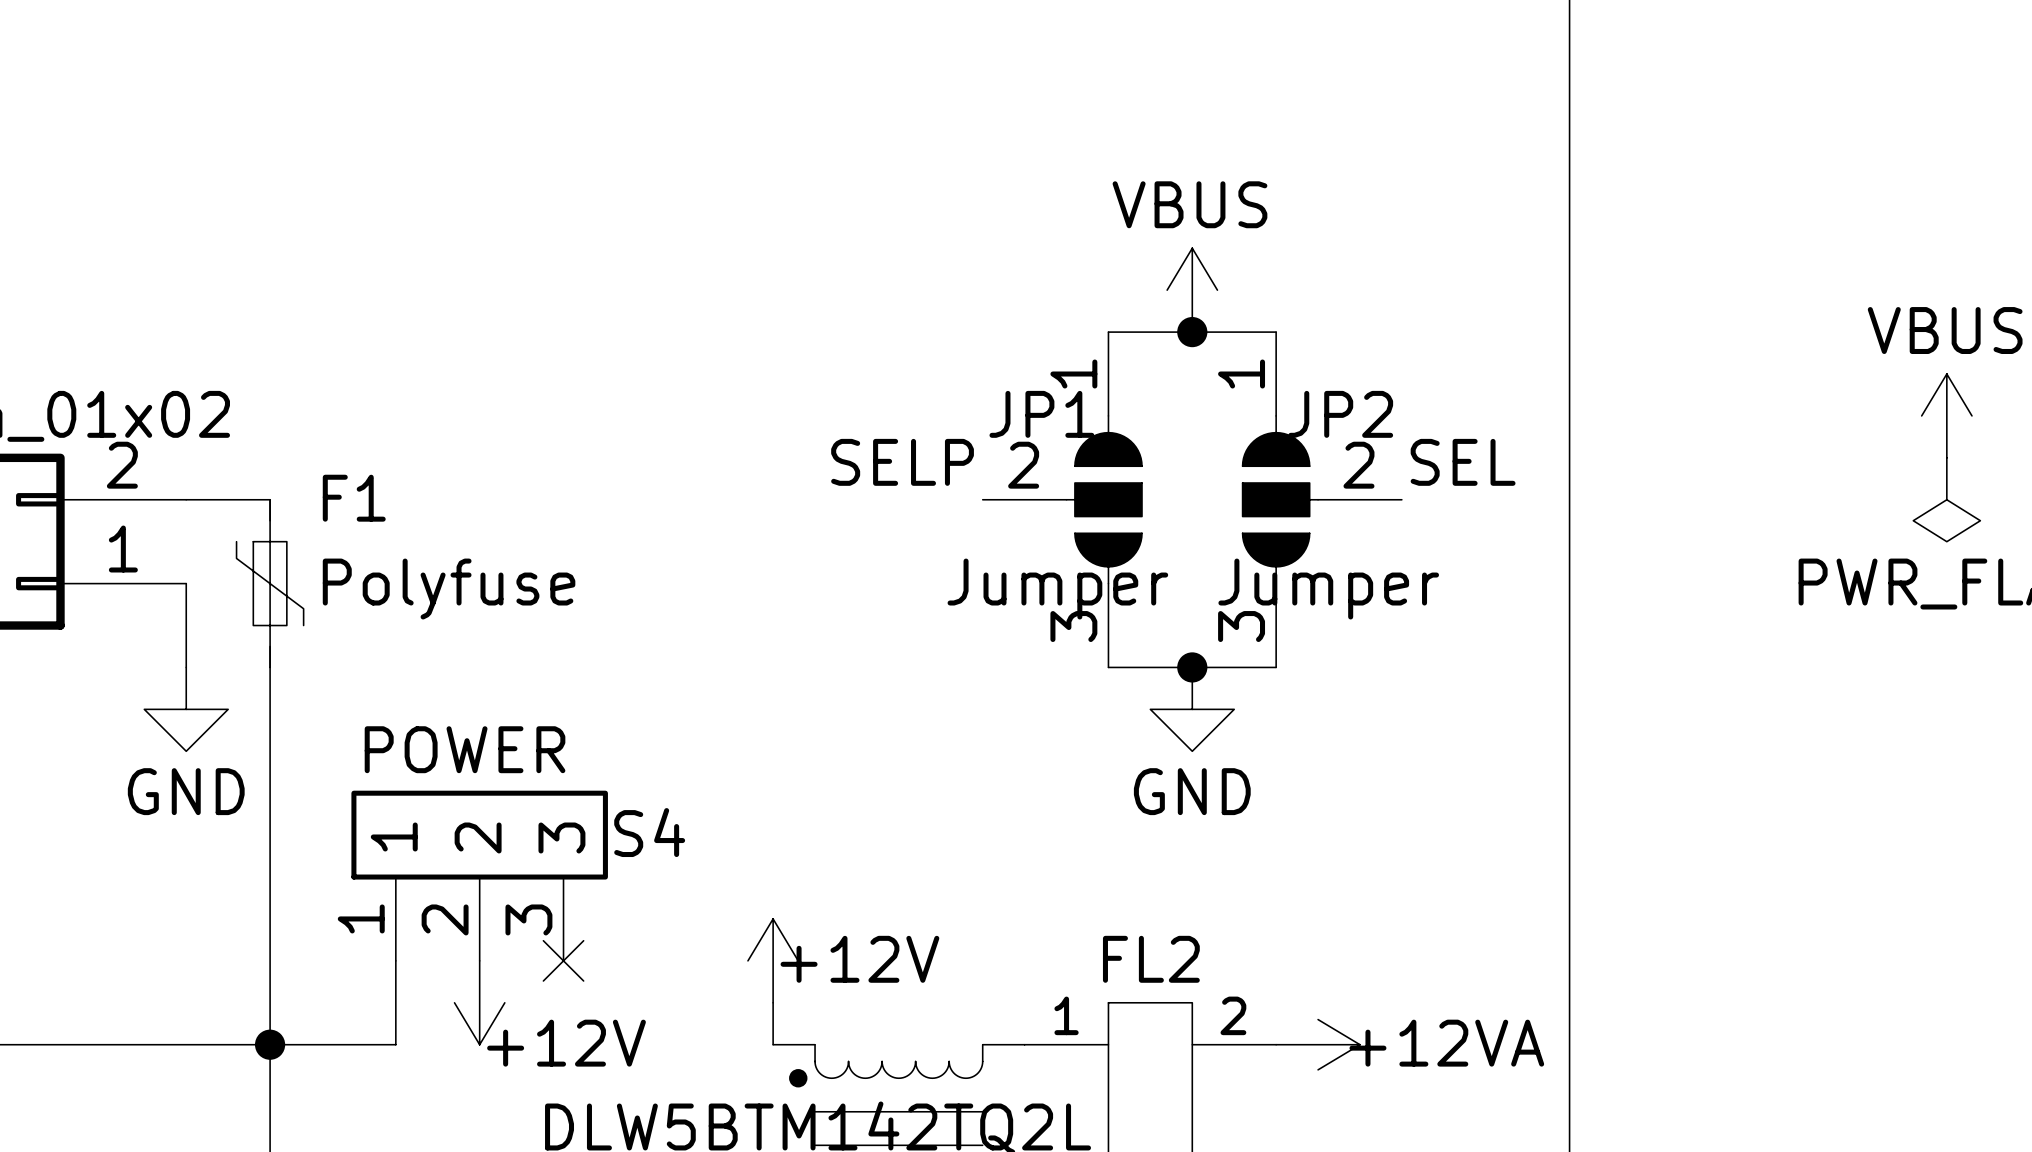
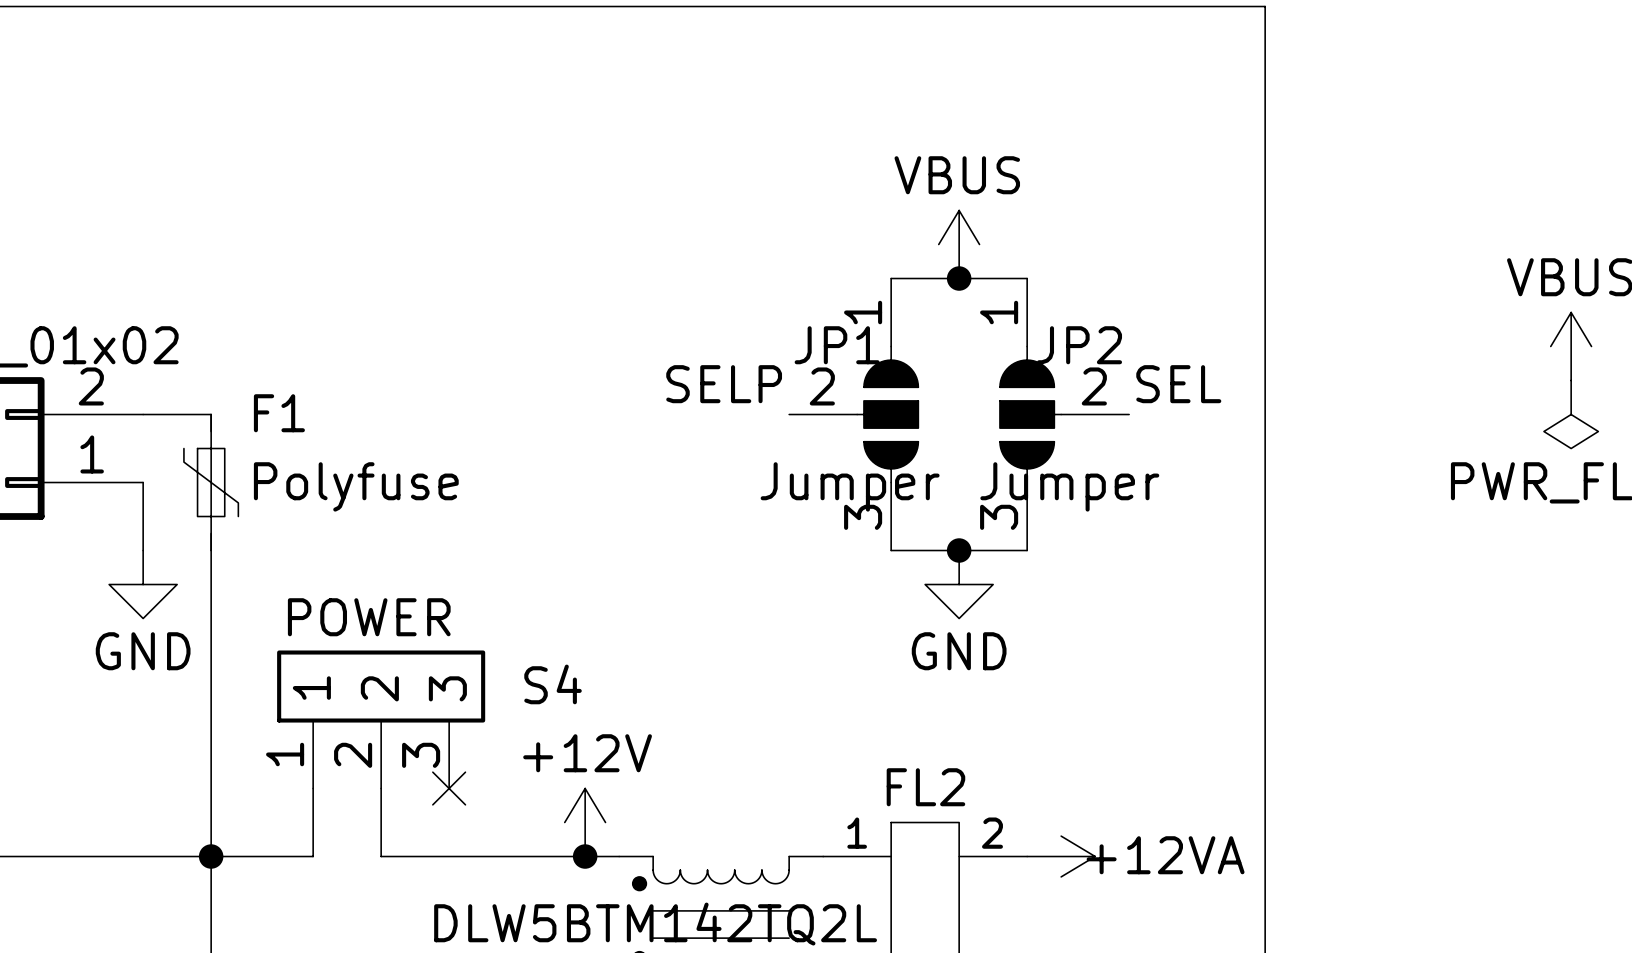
S4 name position: S4 (649, 832) -> S4 (553, 684)
power symbol text position: +12V (859, 959) -> +12V (587, 753)
power symbol position: +12V (773, 960) -> +12V (585, 822)
power symbol: +12V (479, 1002) -> none
wire: (773, 1002) (773, 1044) -> (381, 788) (381, 856) (619, 856)
junction: none -> (585, 856)

